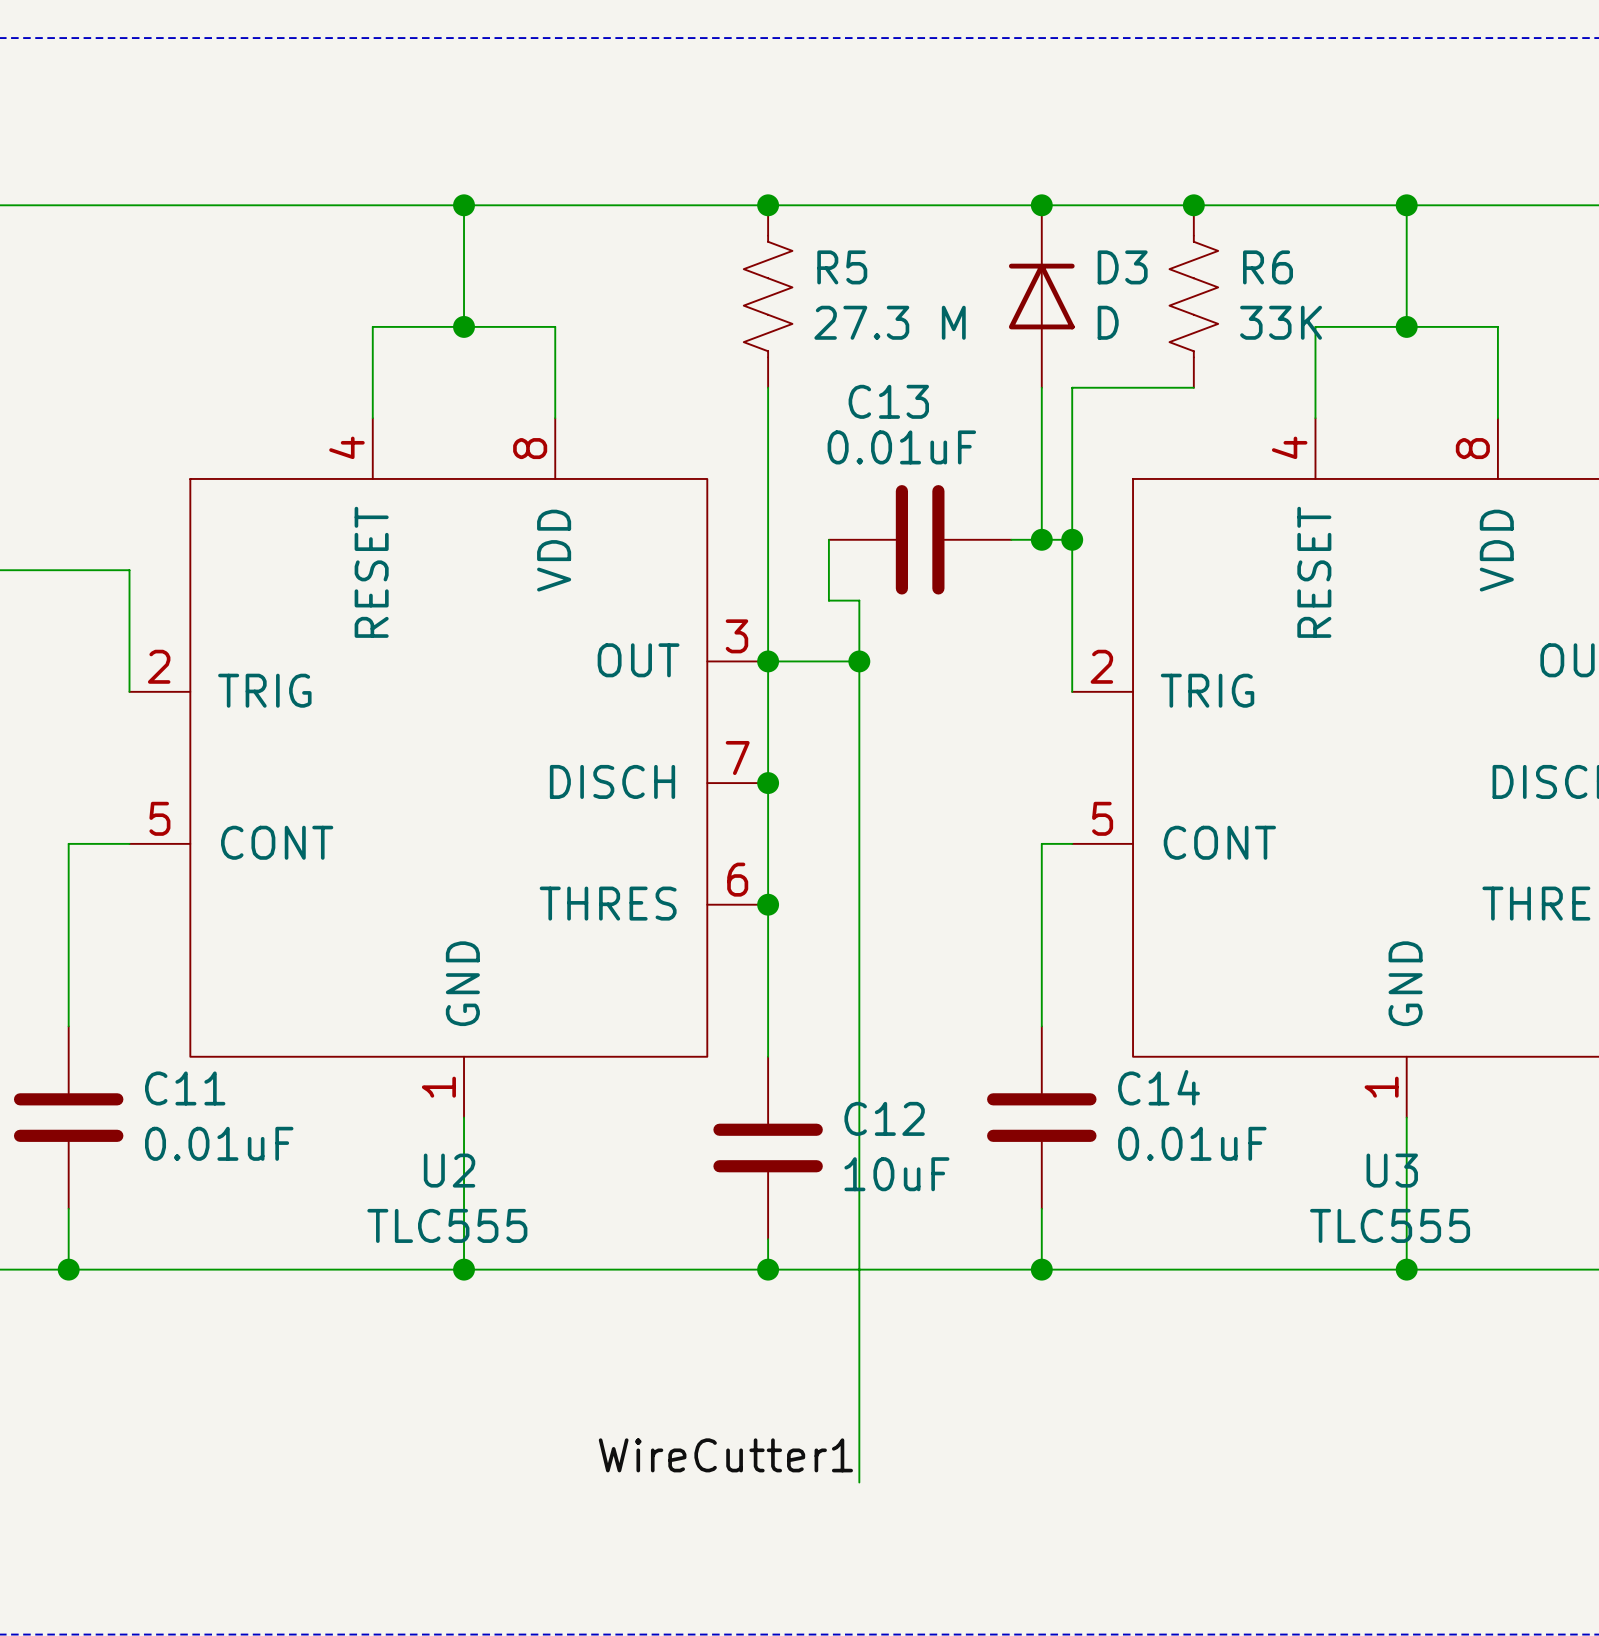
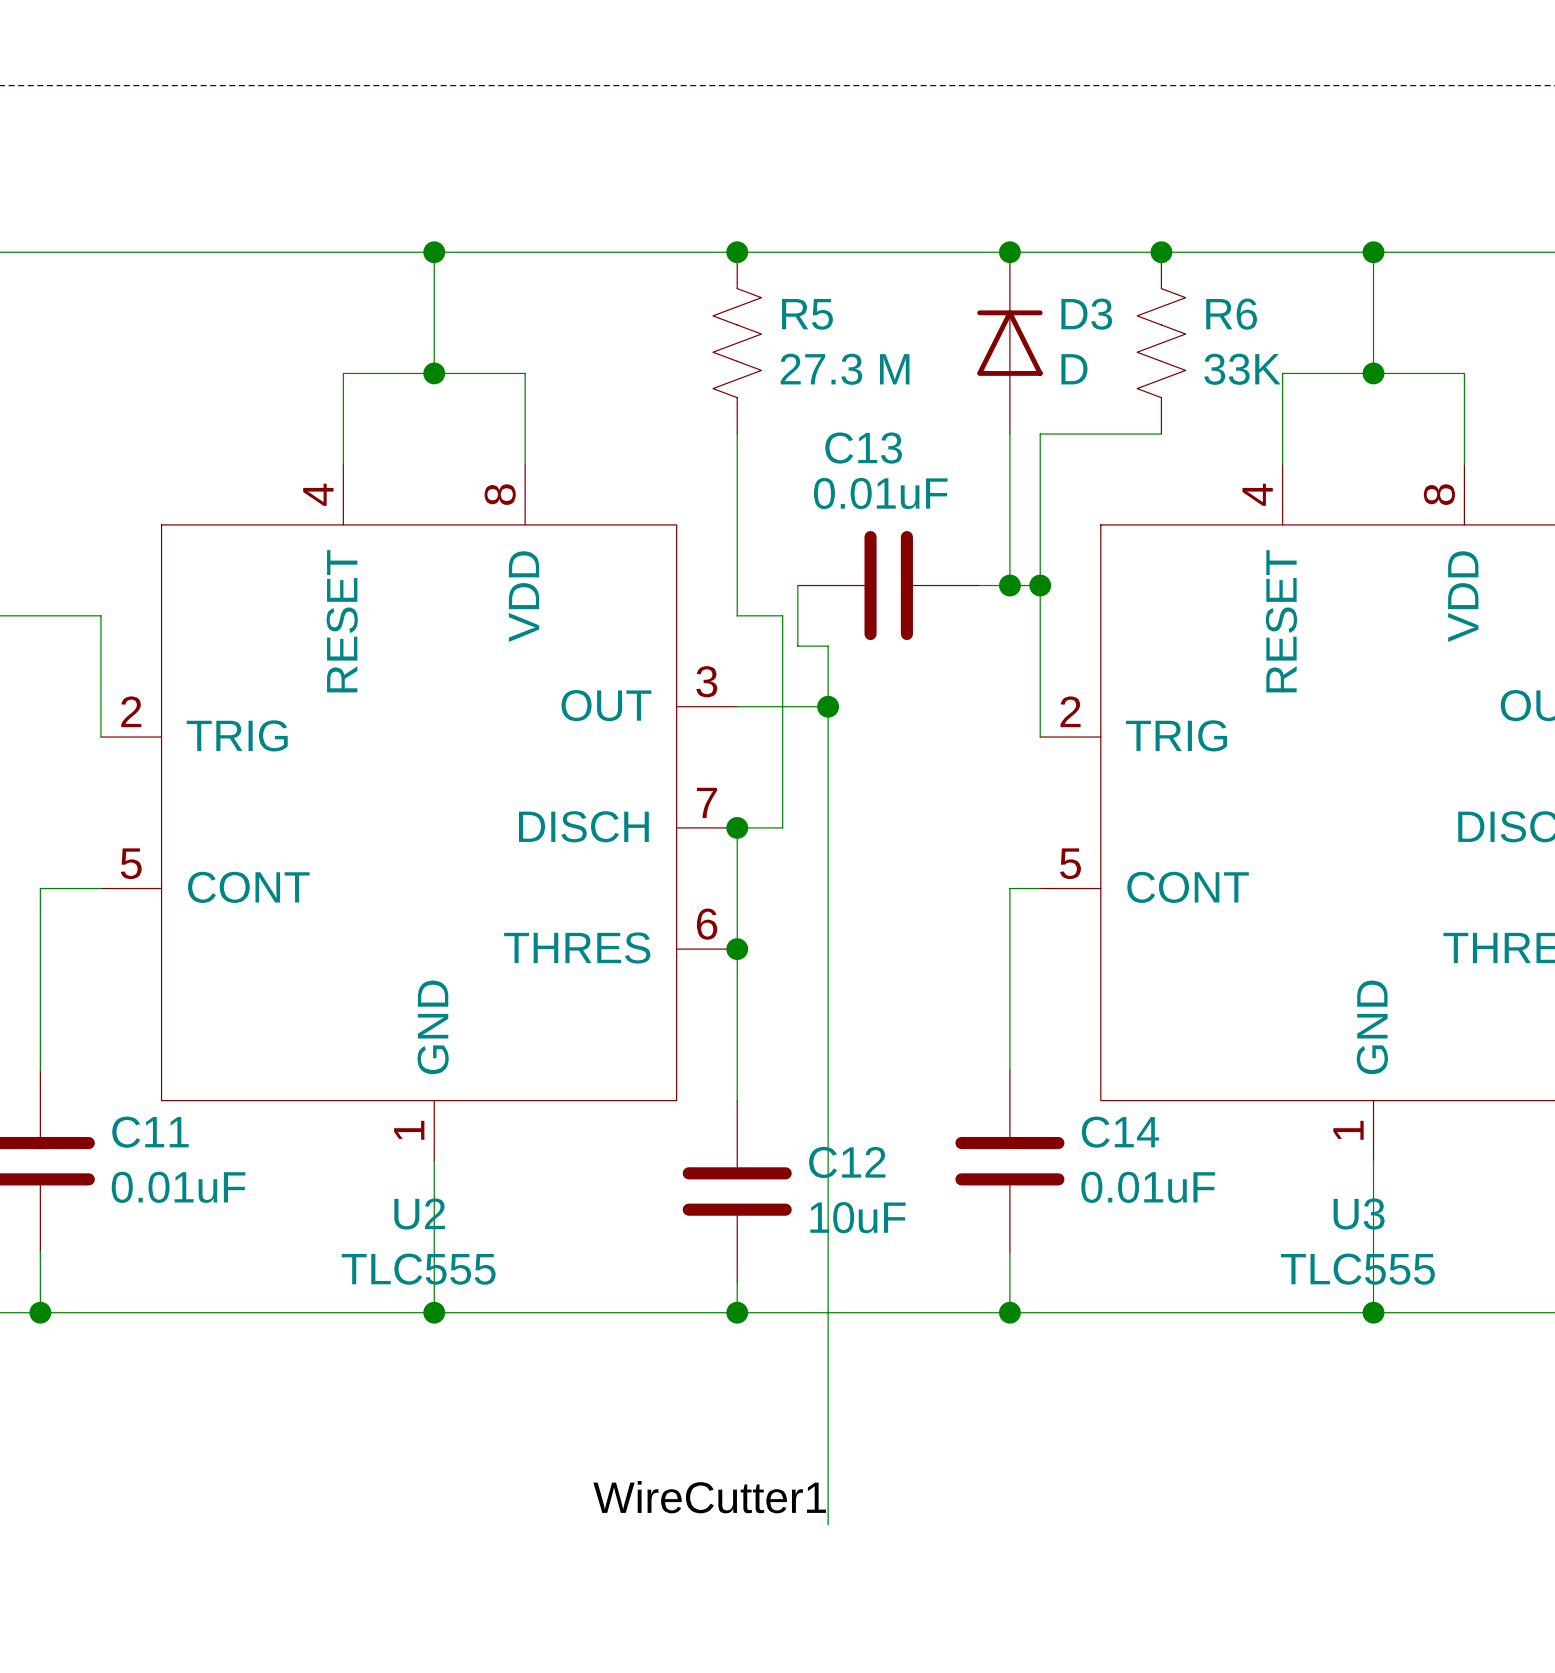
wire: (768, 570) (768, 783) -> (737, 615) (782, 615) (782, 827) (737, 827)
junction: (768, 661) -> none

